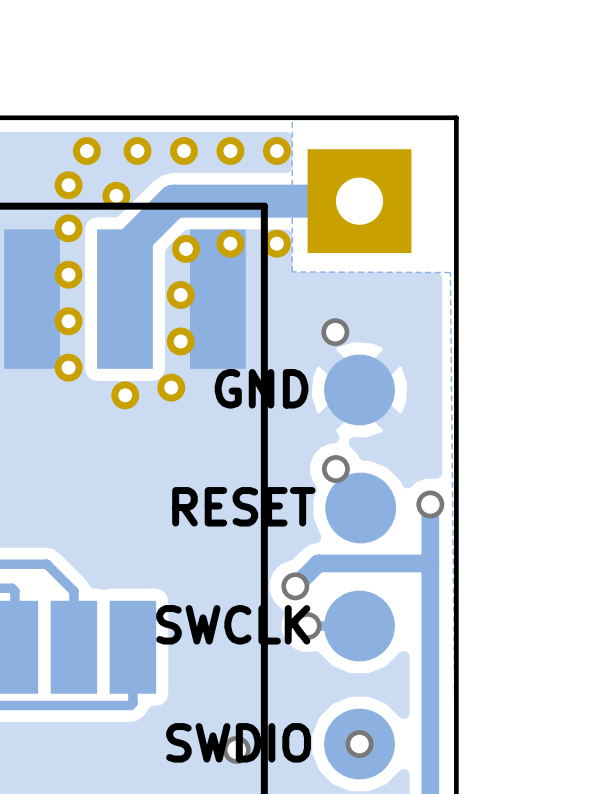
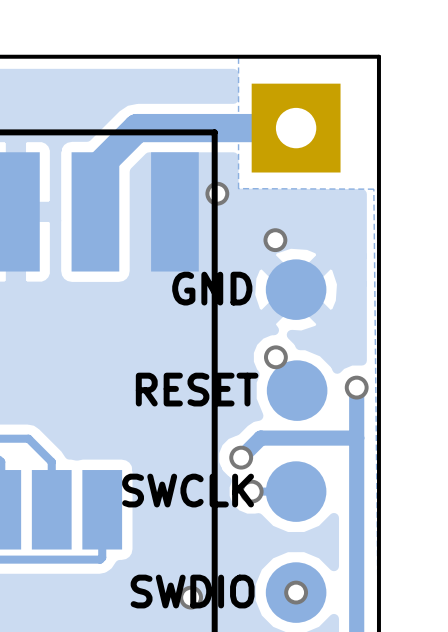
part: (86, 151) -> none
part: (137, 151) -> none
part: (183, 151) -> none
part: (230, 151) -> none
part: (276, 151) -> none
part: (68, 185) -> none
part: (116, 195) -> none
part: (68, 228) -> none
part: (230, 243) -> none
part: (276, 243) -> none
part: (186, 248) -> none
part: (68, 274) -> none
via: none -> (217, 193)
part: (180, 294) -> none
part: (68, 321) -> none
part: (180, 341) -> none
part: (68, 367) -> none
part: (171, 387) -> none
part: (125, 395) -> none

